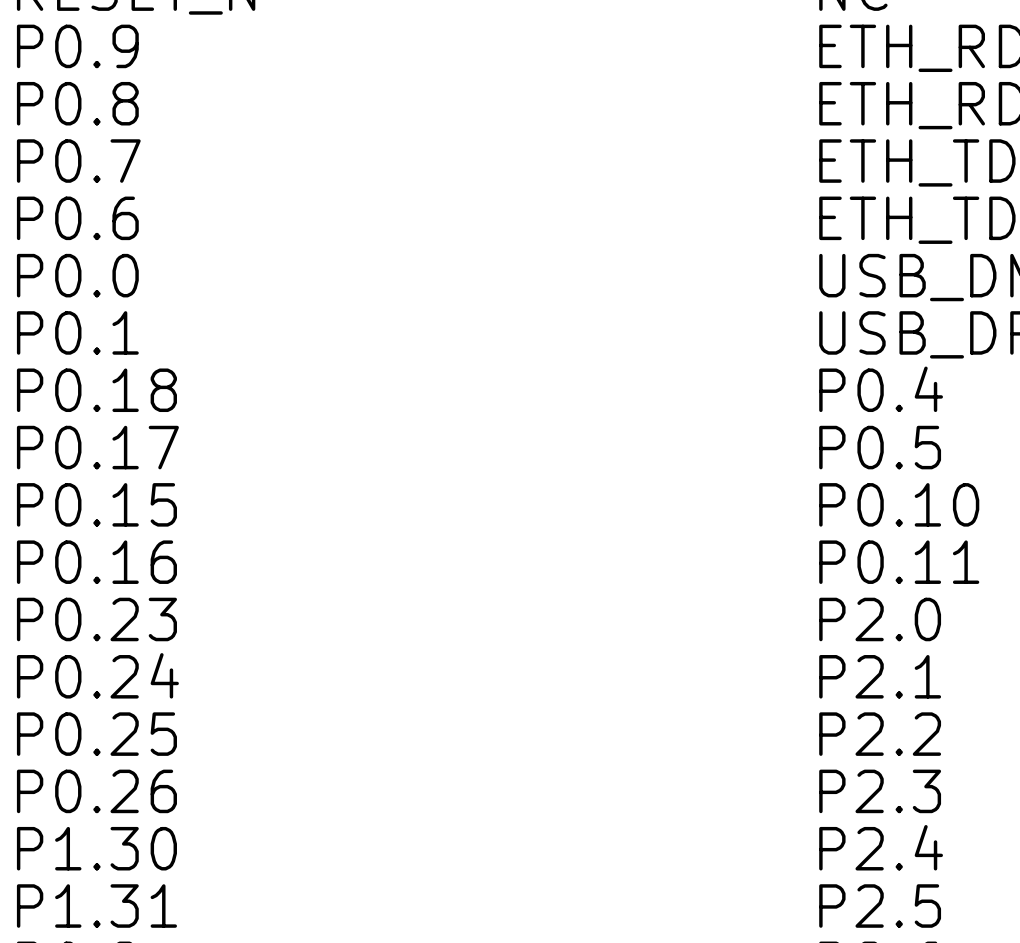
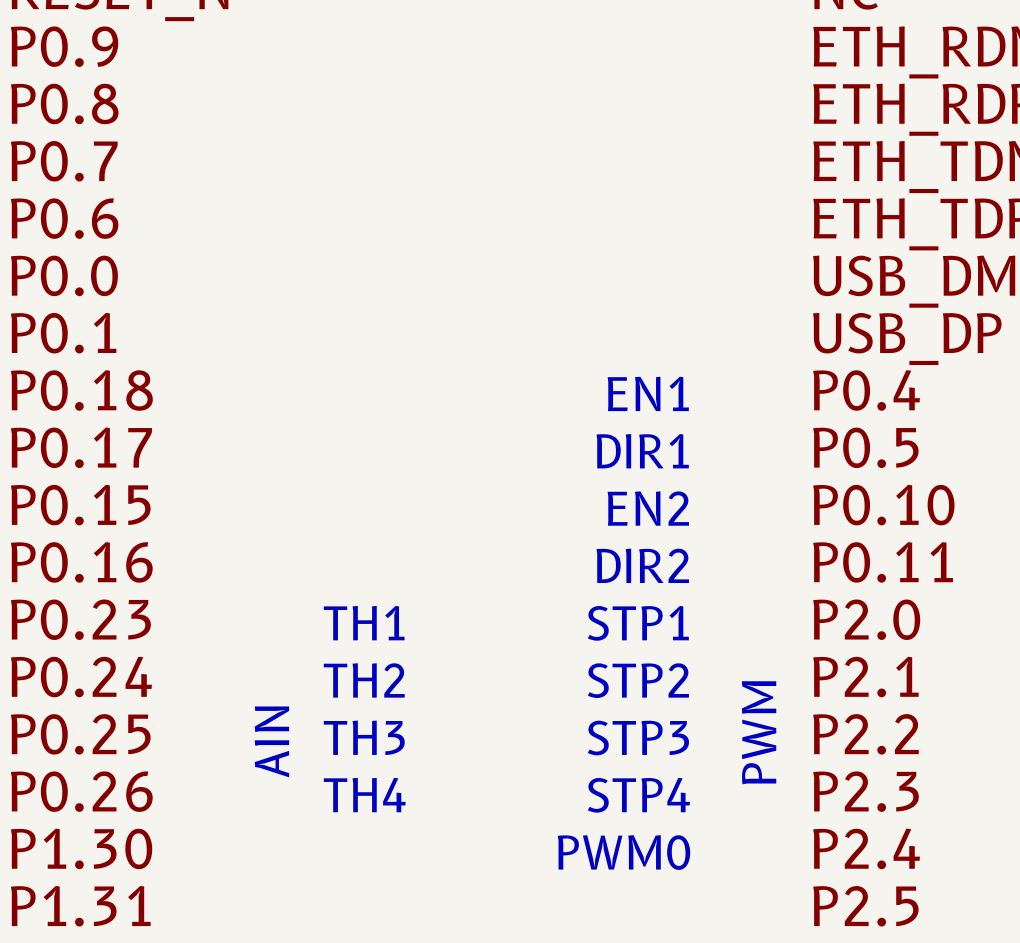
text: none -> EN1 (648, 393)
text: none -> DIR1 (642, 451)
text: none -> EN2 (648, 508)
text: none -> DIR2 (642, 565)
text: none -> TH1 (364, 623)
text: none -> STP1 (638, 623)
text: none -> TH2 (364, 680)
text: none -> STP2 (638, 680)
text: none -> PWM (759, 732)
text: none -> TH3 (364, 737)
text: none -> STP3 (638, 737)
text: none -> AIN (271, 741)
text: none -> TH4 (364, 795)
text: none -> STP4 (638, 795)
text: none -> PWM0 (623, 852)

